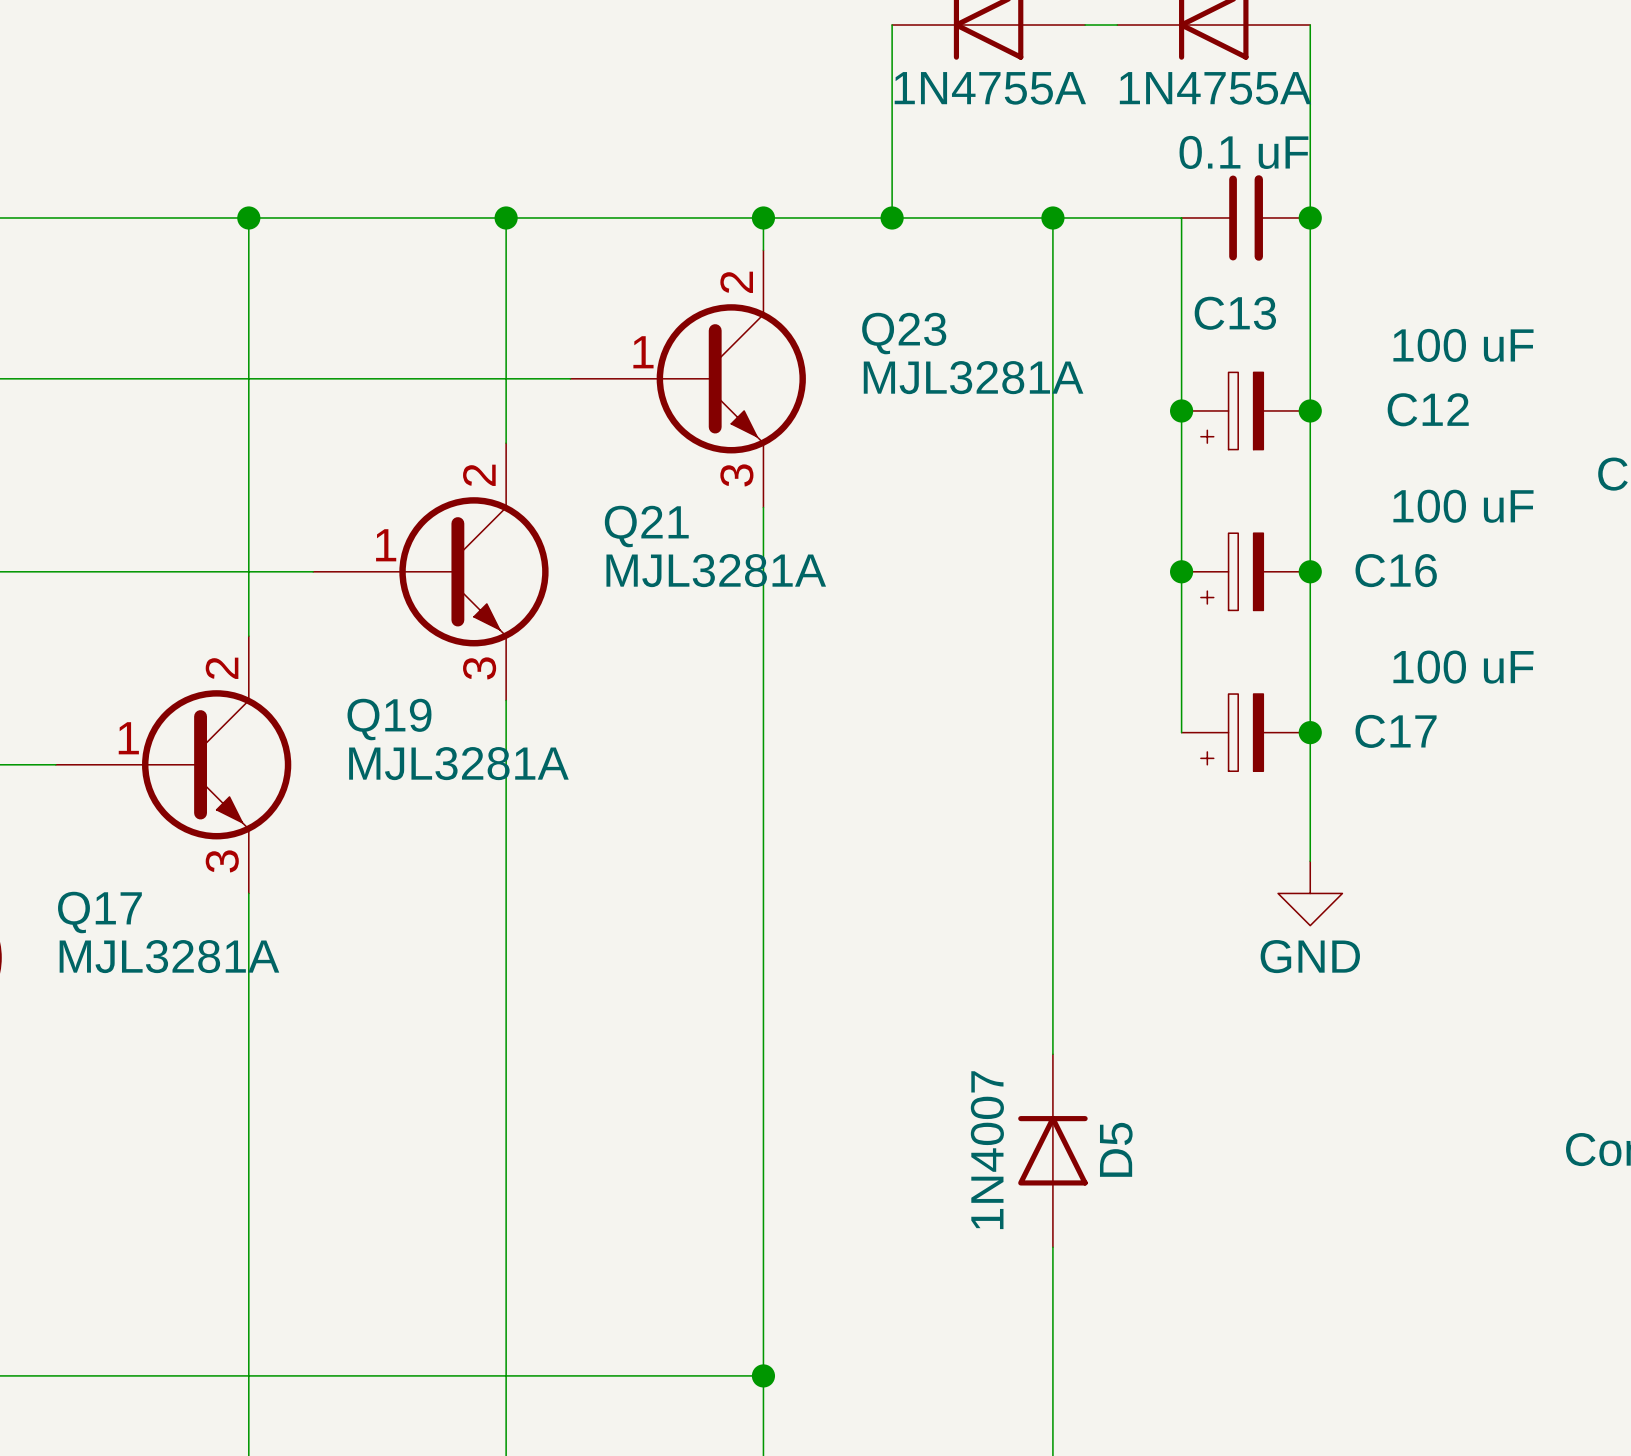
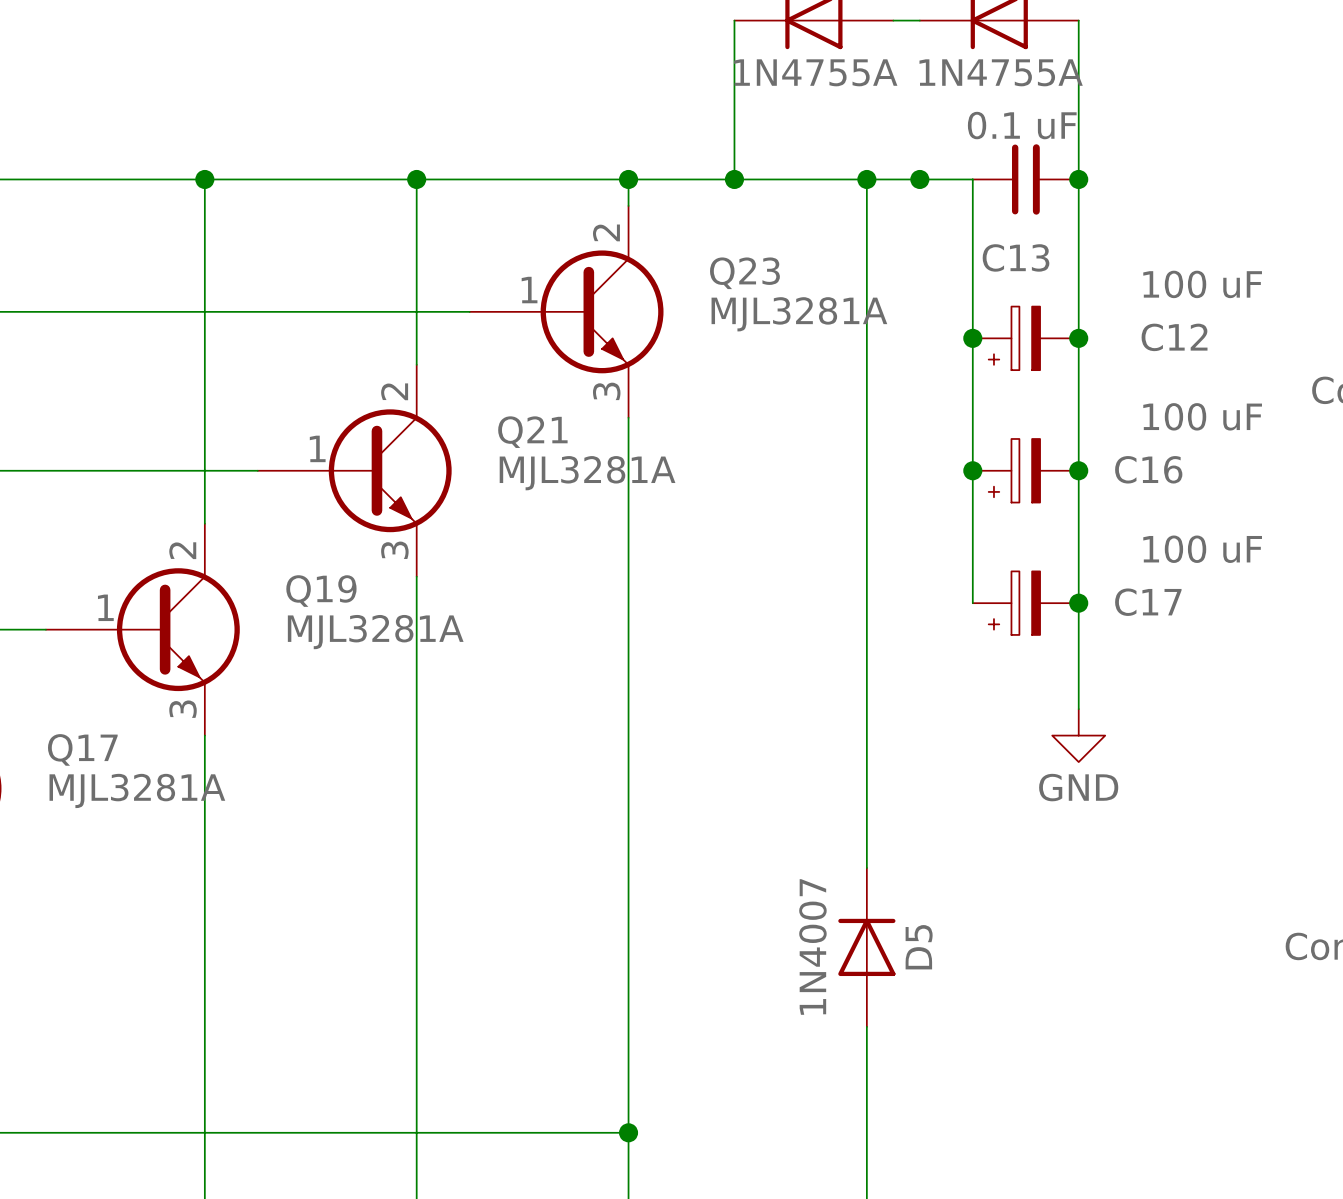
junction: none -> (919, 179)

